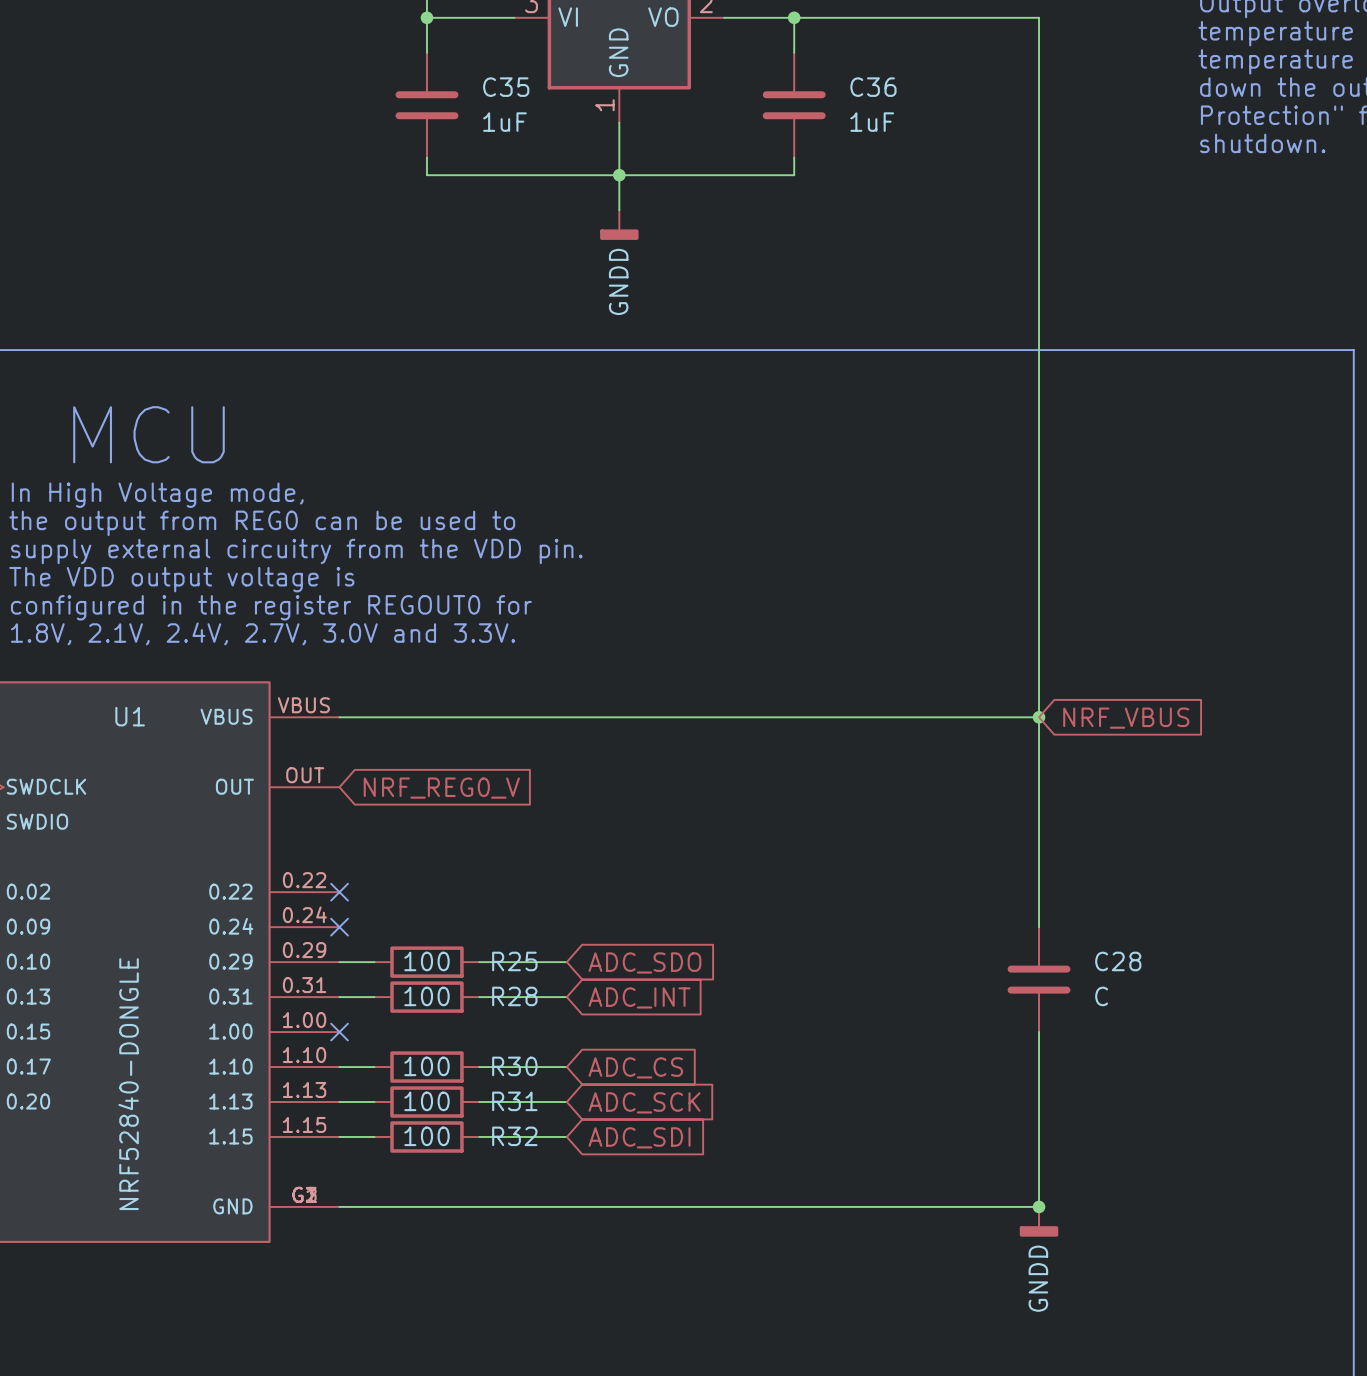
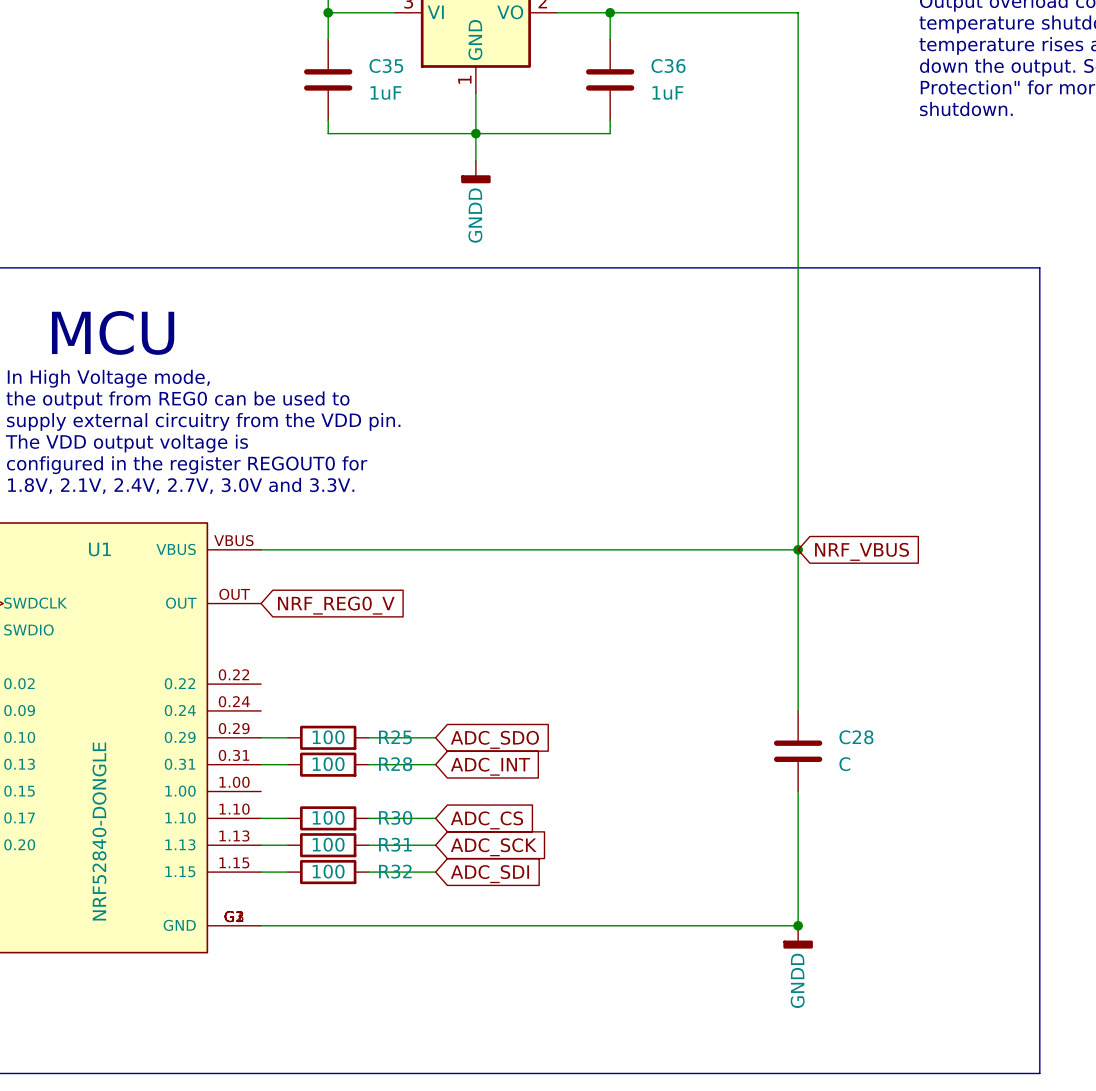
no-connect mark: (339, 892) -> none
no-connect mark: (339, 927) -> none
no-connect mark: (339, 1032) -> none

